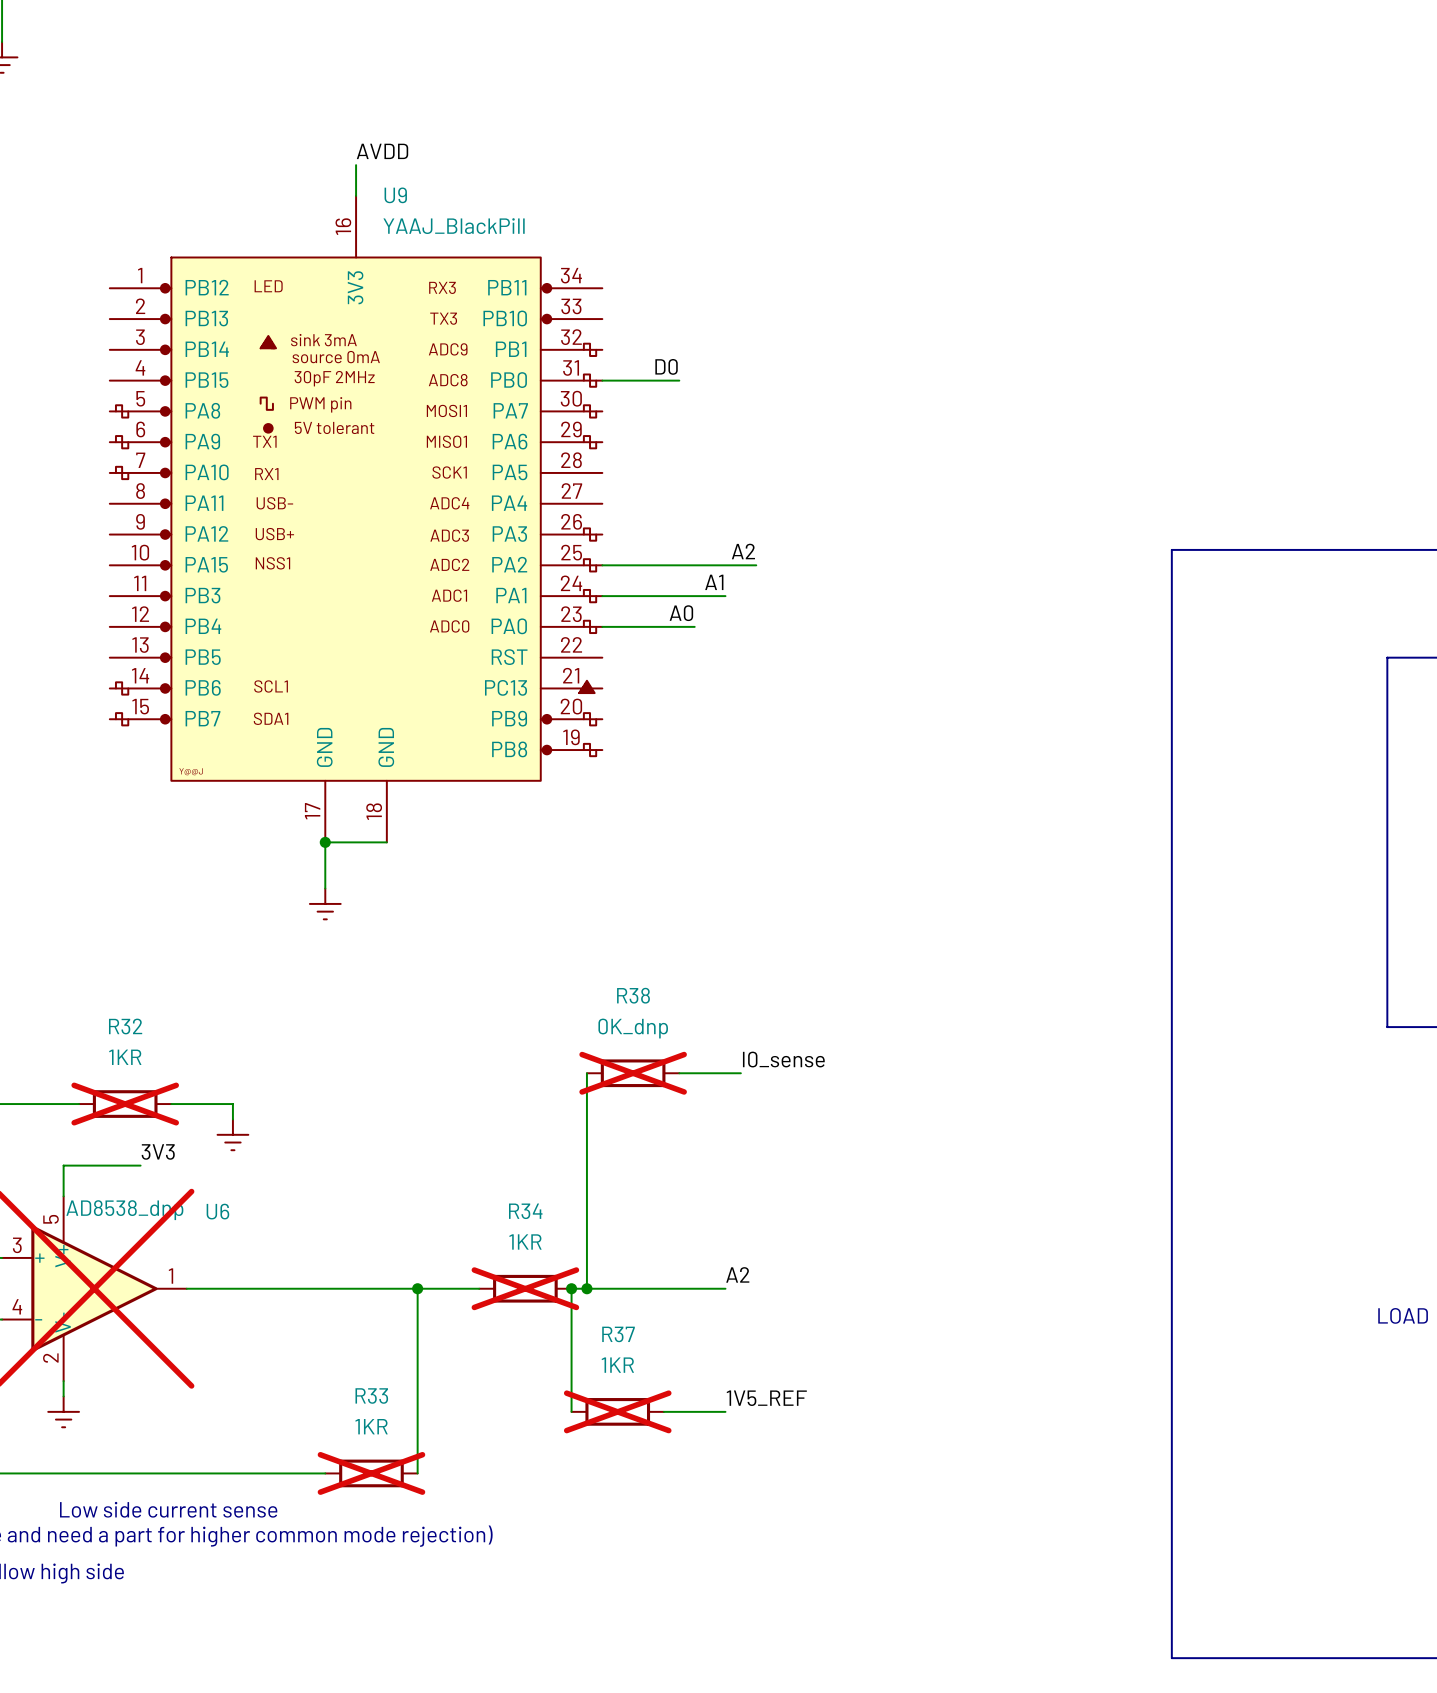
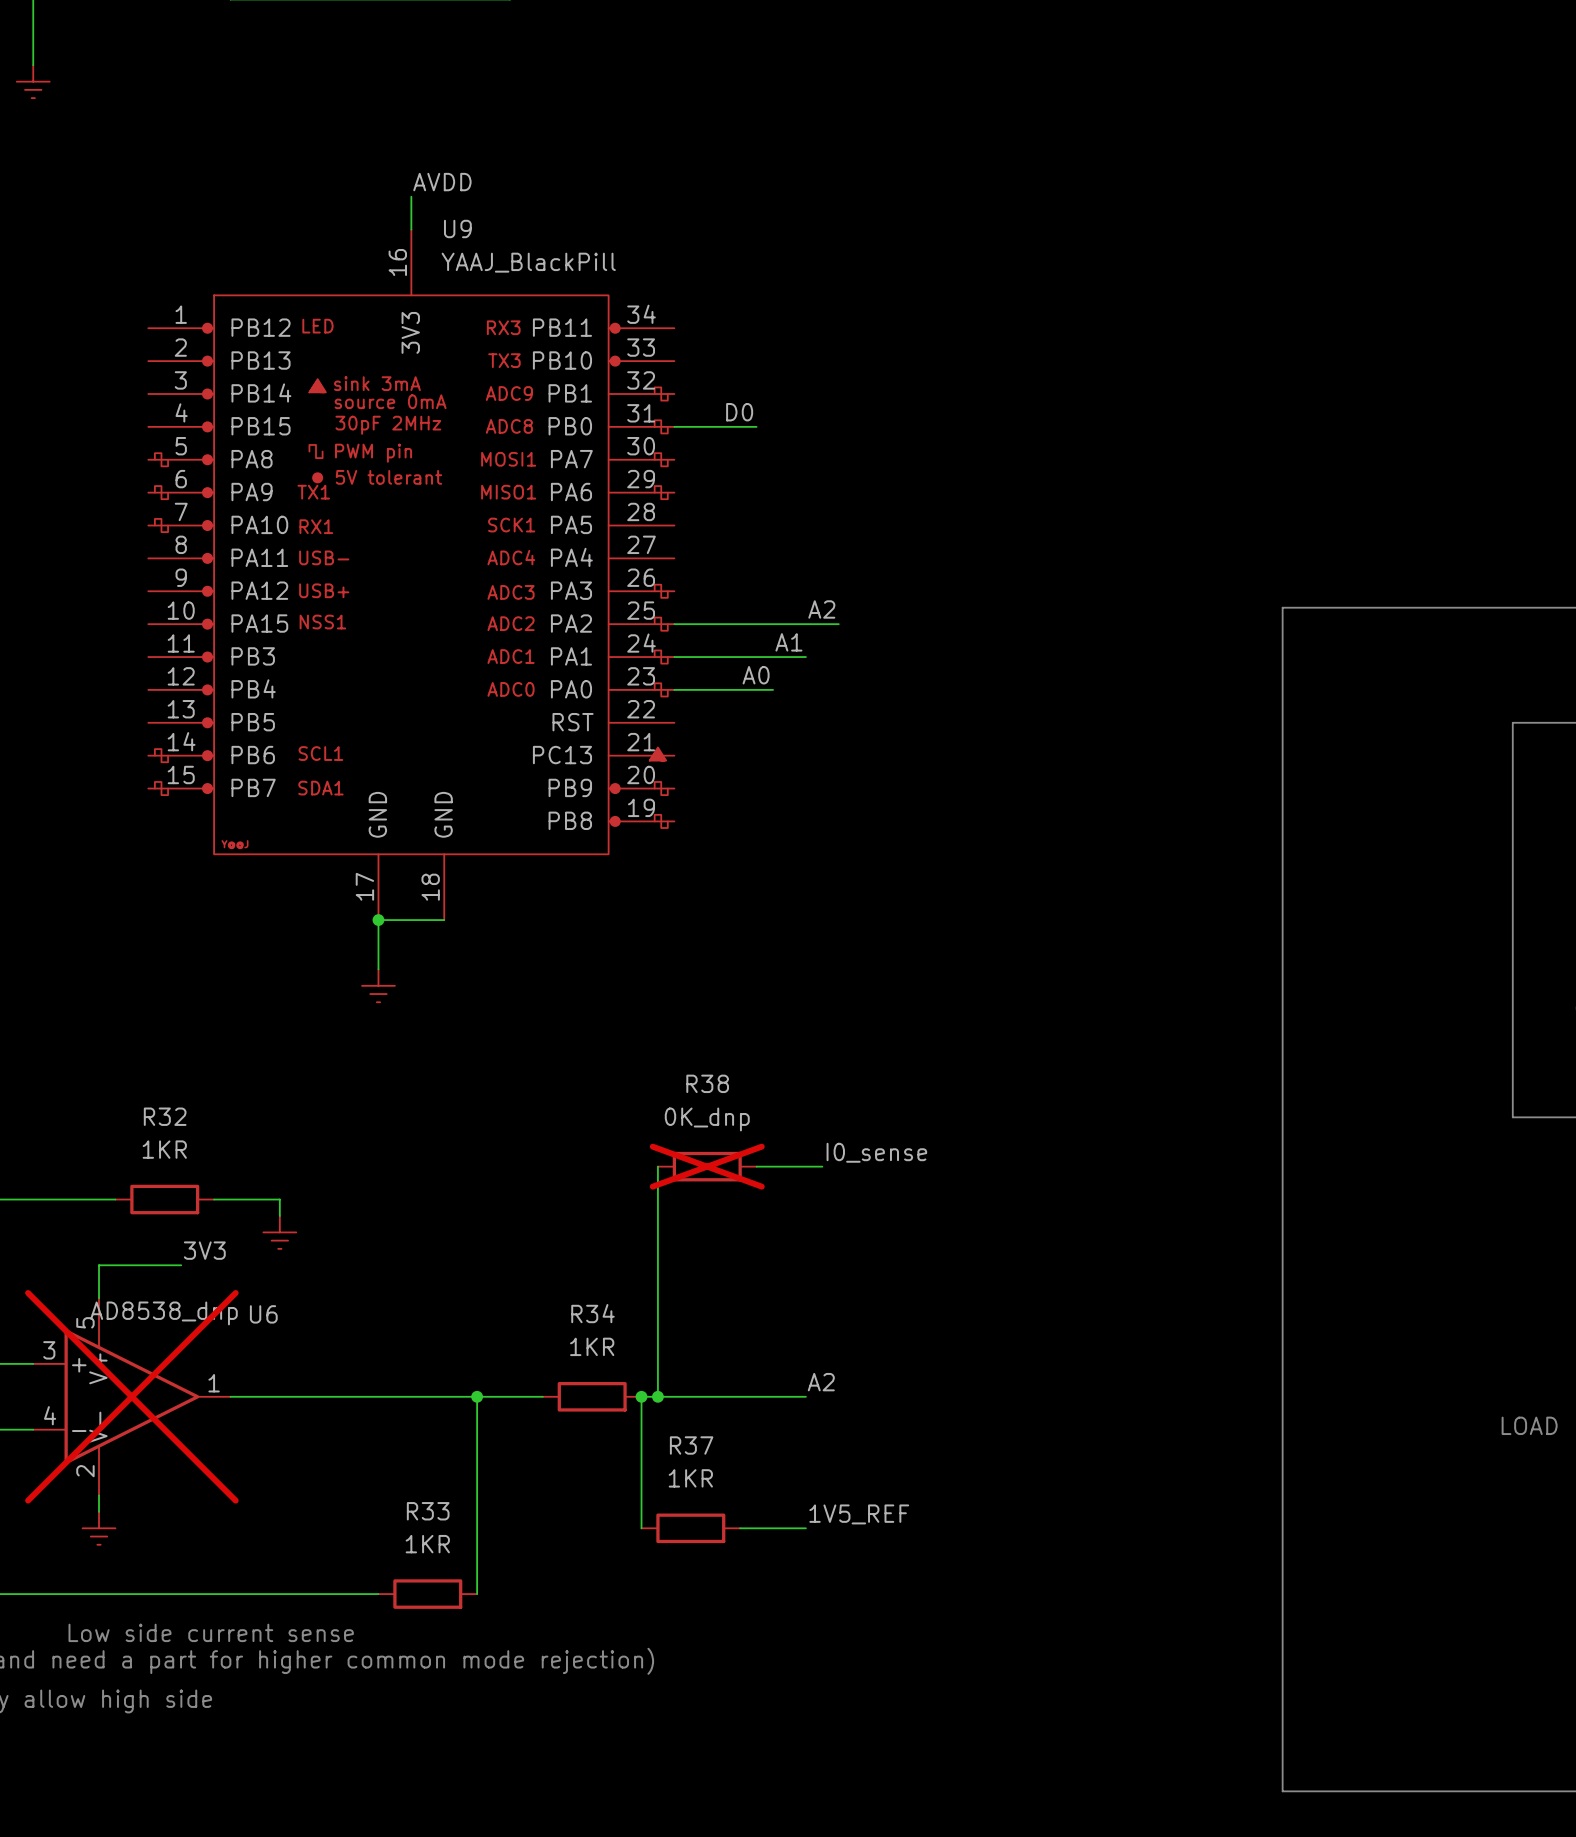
R32 do-not-place cross: (125, 1104) -> none
R34 do-not-place cross: (525, 1288) -> none
R37 do-not-place cross: (617, 1411) -> none
R33 do-not-place cross: (371, 1473) -> none

